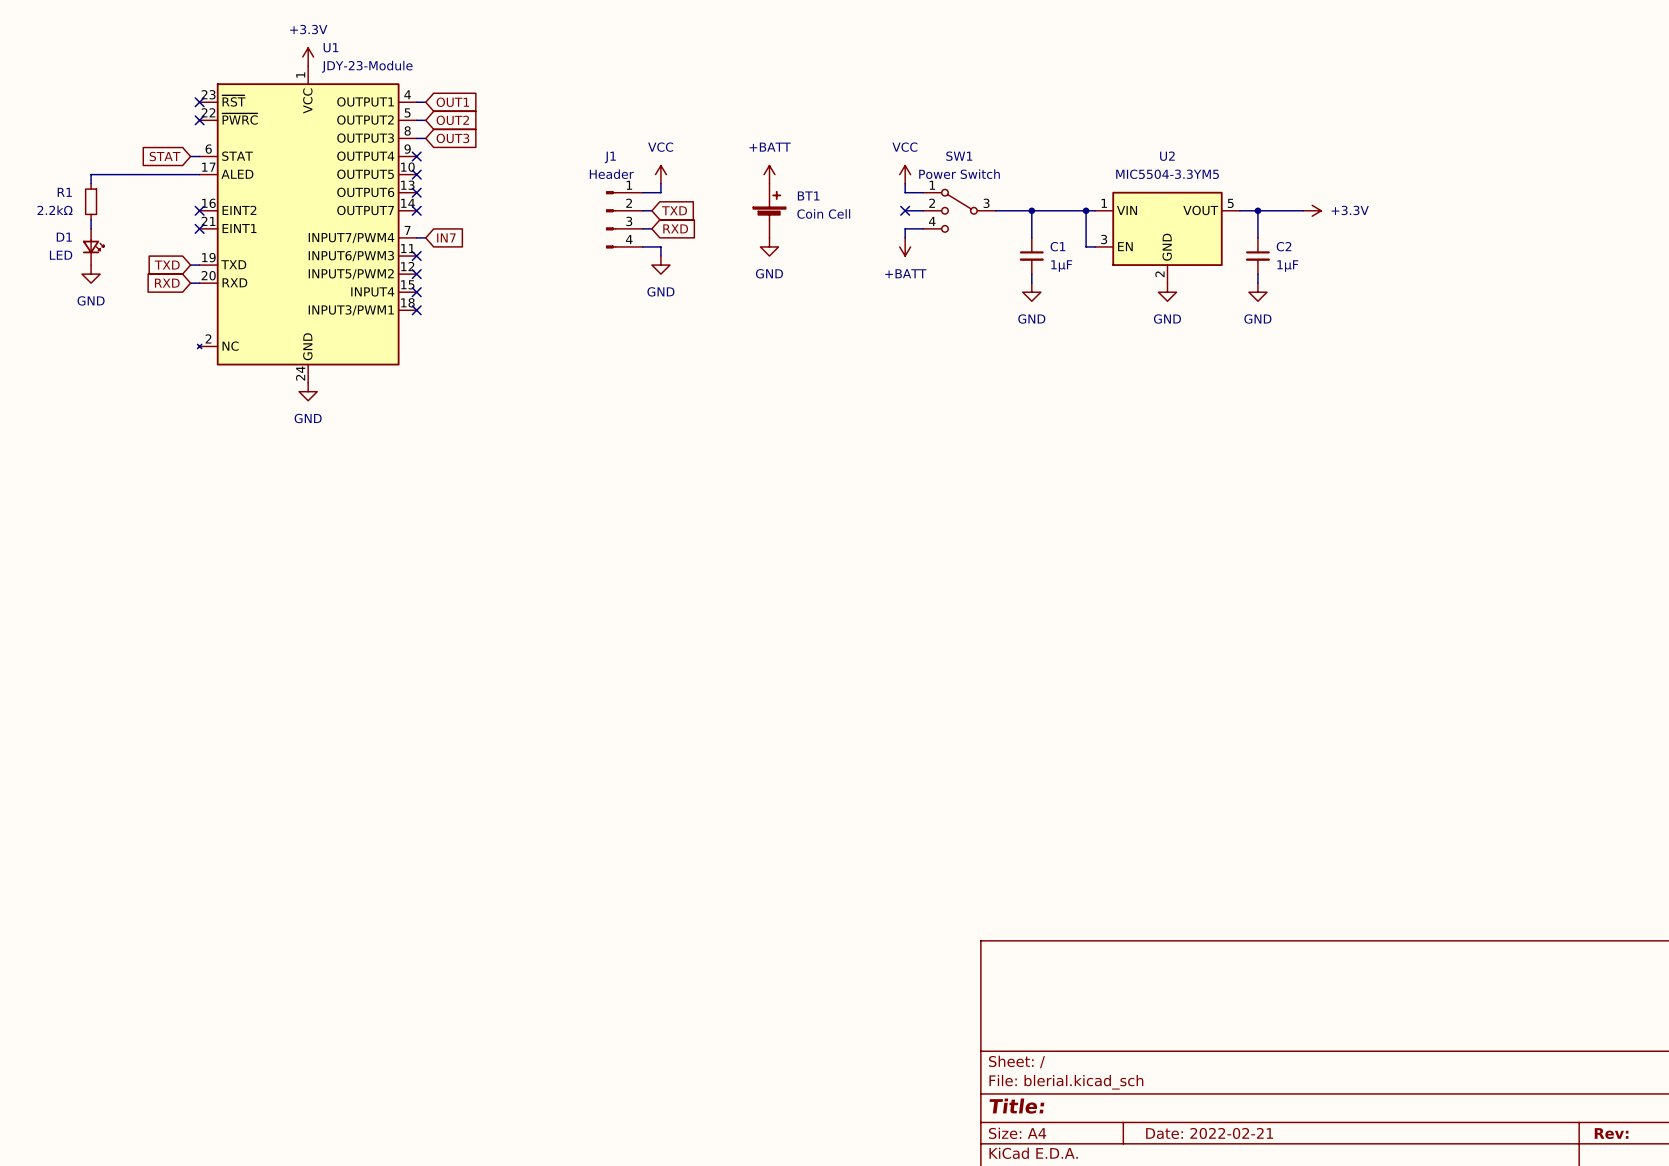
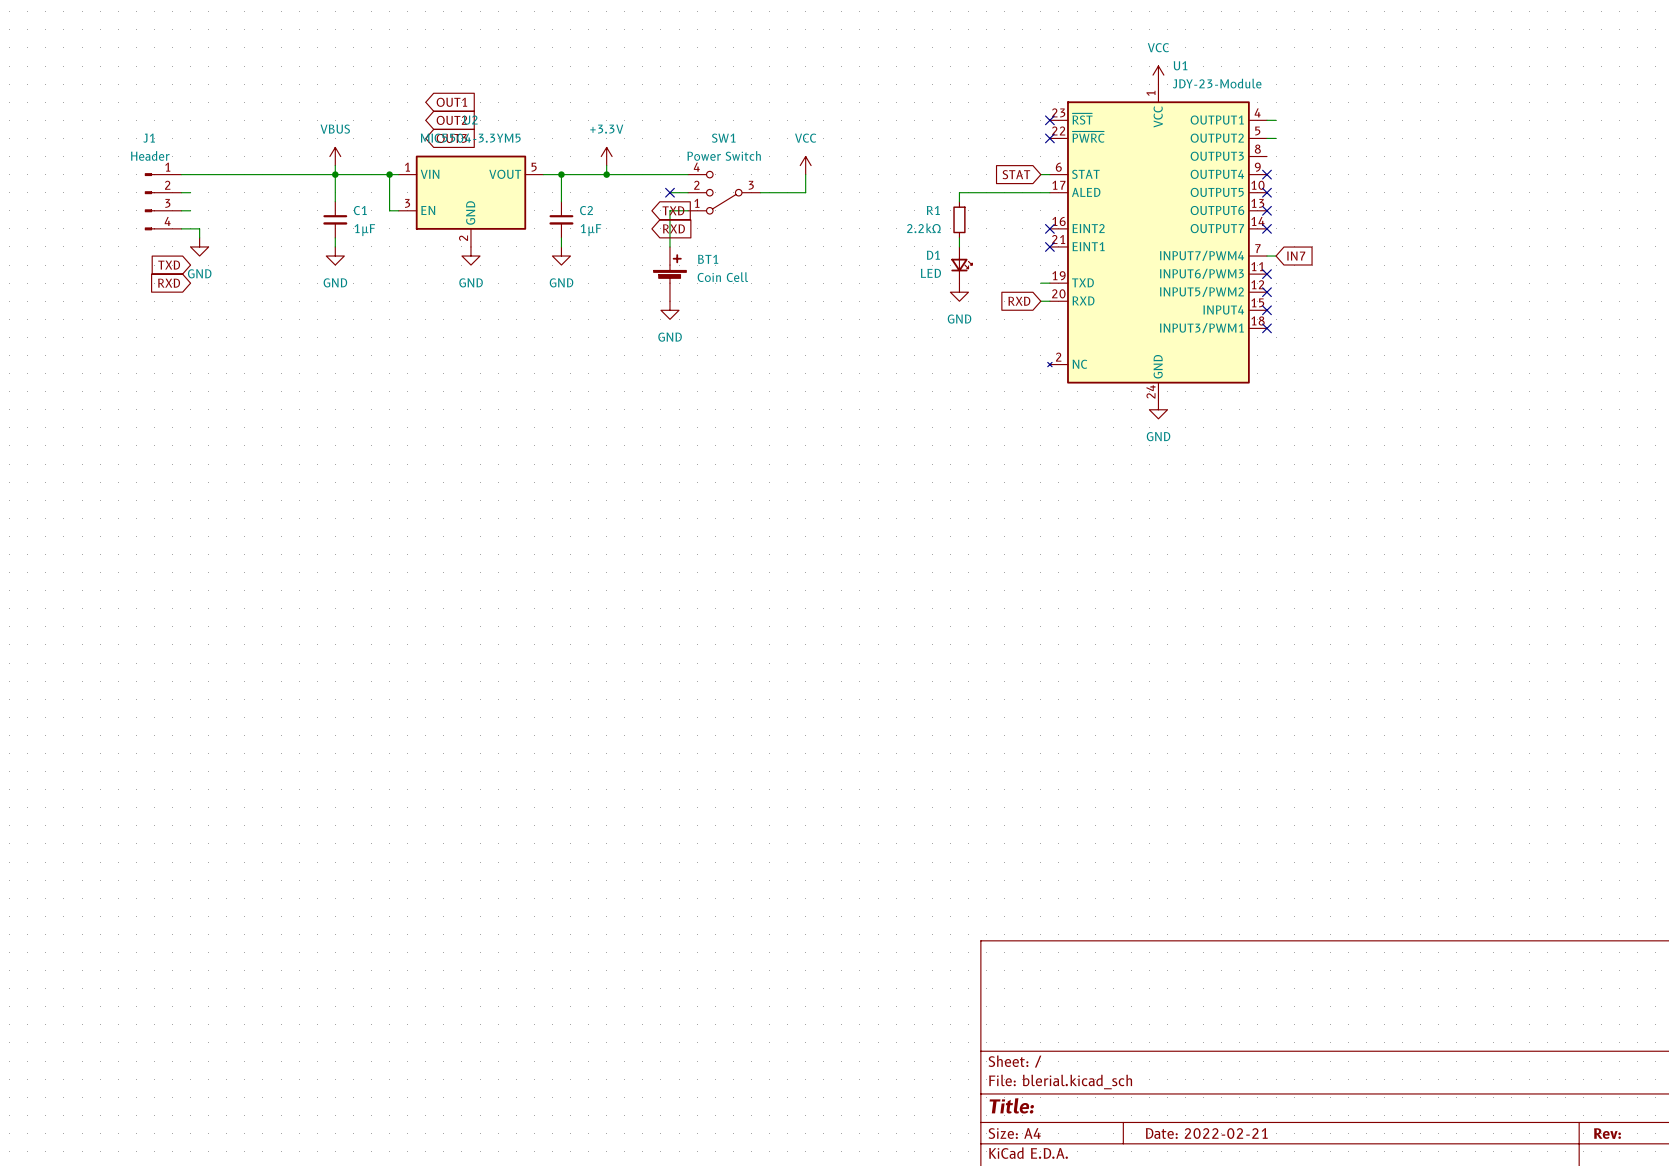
power symbol: +3.3V (308, 57) -> none
power symbol: none -> VCC (1158, 75)
no-connect mark: (199, 102) -> none
wire: (416, 102) (425, 102) -> none
no-connect mark: (199, 120) -> none
wire: (416, 120) (425, 120) -> none
no-connect mark: none -> (1049, 120)
wire: none -> (1266, 120) (1276, 120)
wire: (416, 138) (425, 138) -> none
no-connect mark: none -> (1049, 138)
wire: none -> (1266, 138) (1276, 138)
global label: STAT (165, 156) -> none
wire: (190, 156) (199, 156) -> none
power symbol: none -> VBUS (335, 156)
no-connect mark: (416, 156) -> none
power symbol: none -> +3.3V (606, 156)
wire: none -> (606, 165) (606, 174)
power symbol: none -> VCC (805, 165)
wire: (181, 174) (91, 174) (91, 183) -> none
junction: none -> (335, 174)
junction: none -> (389, 174)
no-connect mark: (416, 174) -> none
wire: none -> (543, 174) (688, 174)
wire: none -> (561, 174) (561, 201)
junction: none -> (561, 174)
junction: none -> (606, 174)
power symbol: VCC (660, 174) -> none
power symbol: +BATT (769, 174) -> none
wire: none -> (805, 174) (805, 192) (760, 192)
power symbol: VCC (905, 174) -> none
global label: none -> STAT (1016, 174)
wire: none -> (1040, 174) (1049, 174)
no-connect mark: none -> (1266, 174)
wire: (660, 183) (660, 192) (642, 192) -> none
wire: (905, 183) (905, 192) (923, 192) -> none
no-connect mark: (416, 192) -> none
wire: none -> (669, 192) (688, 192)
no-connect mark: none -> (669, 192)
wire: none -> (1049, 192) (959, 192) (959, 201)
no-connect mark: none -> (1266, 192)
R1 position: (91, 201) -> (959, 219)
no-connect mark: (199, 210) -> none
no-connect mark: (416, 210) -> none
wire: (642, 210) (651, 210) -> none
wire: none -> (688, 210) (669, 210) (669, 246)
BT1 position: (769, 210) -> (669, 274)
wire: (905, 210) (923, 210) -> none
no-connect mark: (905, 210) -> none
SW1 flip: as is (959, 210) -> up-down (724, 192)
SW1 position: (959, 210) -> (724, 192)
wire: (995, 210) (1095, 210) -> none
wire: (1031, 210) (1031, 237) -> none
junction: (1031, 210) -> none
junction: (1086, 210) -> none
wire: (1239, 210) (1303, 210) -> none
wire: (1257, 210) (1257, 237) -> none
junction: (1257, 210) -> none
no-connect mark: none -> (1266, 210)
power symbol: +3.3V (1312, 210) -> none
wire: (91, 219) (91, 228) -> none
J1 position: (624, 219) -> (163, 201)
U1 position: (307, 224) -> (1157, 242)
wire: none -> (181, 228) (199, 228) (199, 237)
no-connect mark: (199, 228) -> none
wire: (642, 228) (651, 228) -> none
wire: (923, 228) (905, 228) (905, 237) -> none
no-connect mark: none -> (1049, 228)
no-connect mark: none -> (1266, 228)
wire: (416, 237) (425, 237) -> none
global label: IN7 (446, 237) -> none
wire: none -> (561, 237) (561, 246)
U2 position: (1167, 237) -> (470, 201)
D1 position: (93, 246) -> (961, 265)
power symbol: none -> GND (199, 246)
wire: (642, 246) (660, 246) (660, 256) -> none
power symbol: GND (769, 246) -> none
power symbol: +BATT (905, 246) -> none
no-connect mark: none -> (1049, 246)
power symbol: none -> GND (335, 256)
no-connect mark: (416, 256) -> none
power symbol: none -> GND (470, 256)
power symbol: none -> GND (561, 256)
C1 position: (1031, 256) -> (335, 219)
C2 position: (1257, 256) -> (561, 219)
wire: none -> (1266, 256) (1276, 256)
global label: none -> IN7 (1296, 256)
wire: (190, 265) (199, 265) -> (181, 192) (190, 192)
power symbol position: GND (660, 265) -> GND (669, 310)
power symbol: GND (91, 274) -> none
no-connect mark: (416, 274) -> none
wire: (1031, 274) (1031, 283) -> (959, 237) (959, 246)
wire: (1257, 274) (1257, 283) -> none
no-connect mark: none -> (1266, 274)
wire: (190, 283) (199, 283) -> (181, 210) (190, 210)
wire: none -> (1040, 283) (1049, 283)
no-connect mark: (416, 292) -> none
power symbol position: GND (1031, 292) -> GND (959, 292)
power symbol: GND (1167, 292) -> none
power symbol: GND (1257, 292) -> none
no-connect mark: none -> (1266, 292)
global label: none -> RXD (1019, 301)
wire: none -> (1040, 301) (1049, 301)
no-connect mark: (416, 310) -> none
no-connect mark: none -> (1266, 310)
no-connect mark: none -> (1266, 328)
power symbol: GND (308, 391) -> none
power symbol: none -> GND (1158, 409)

